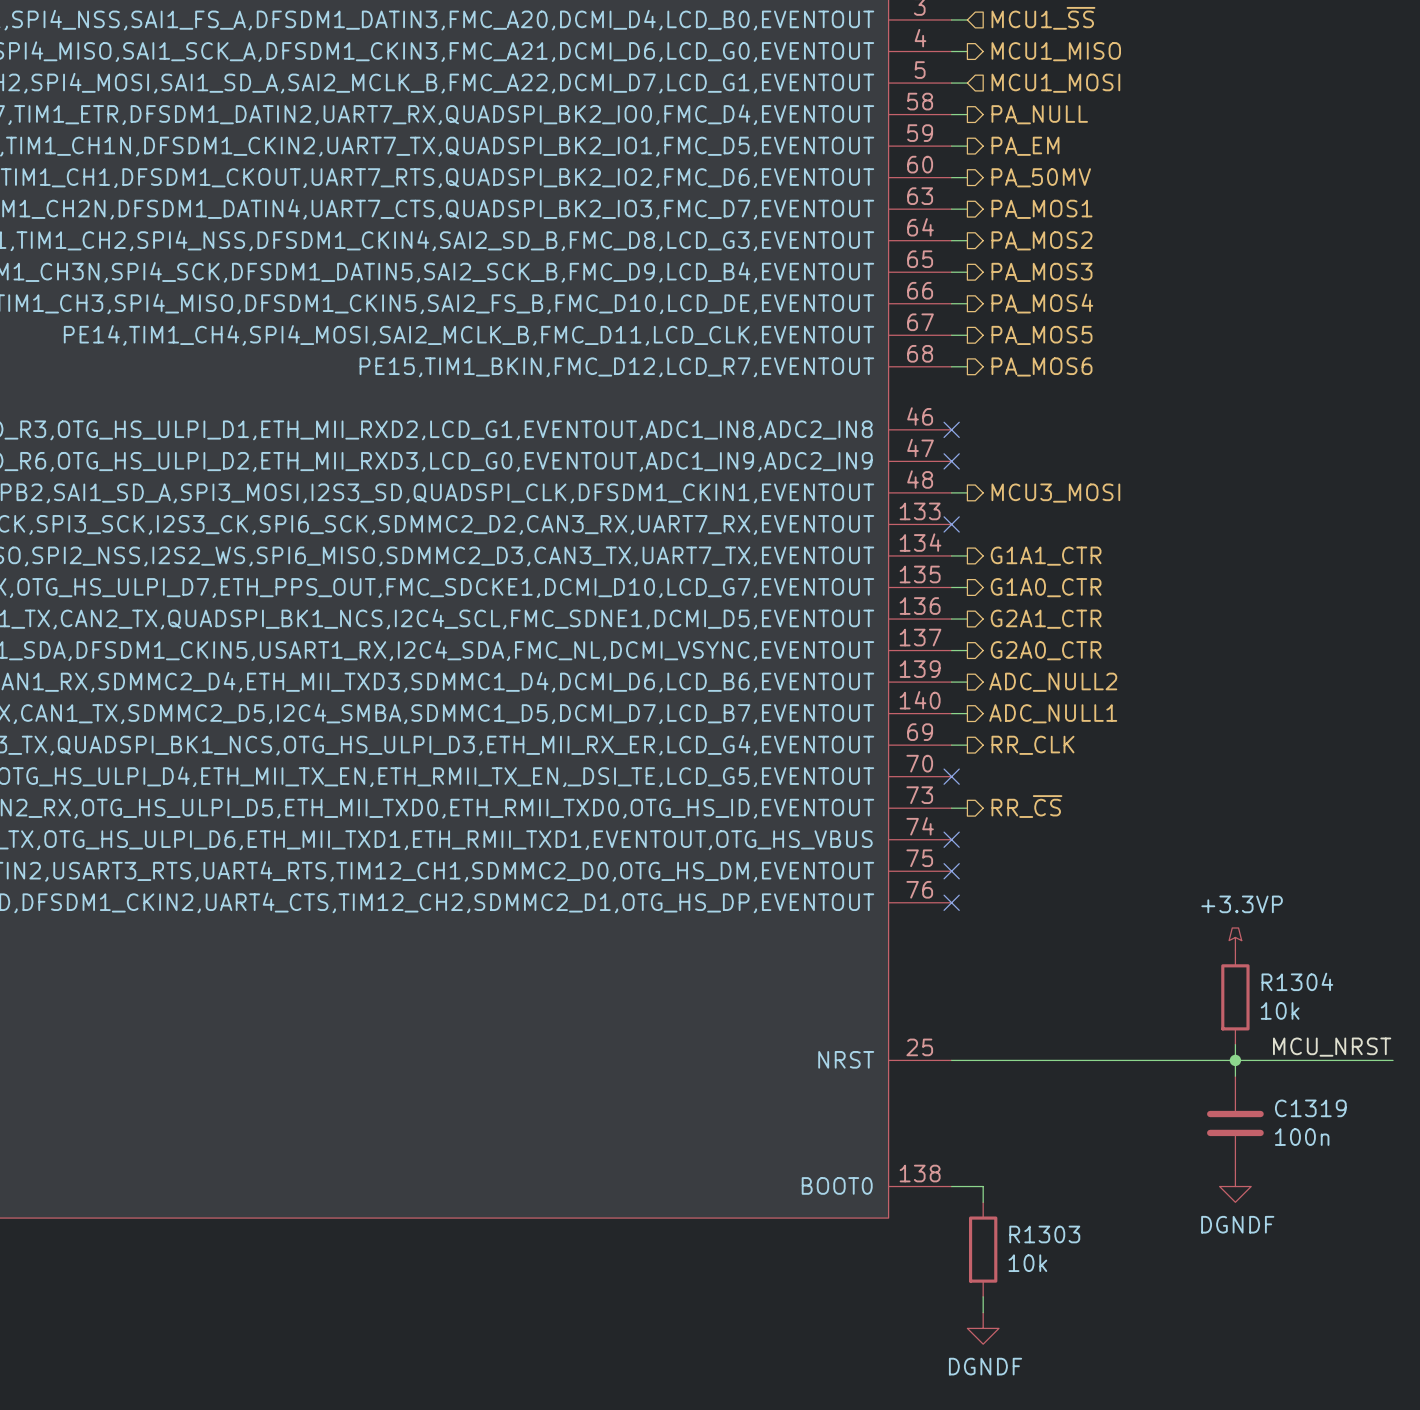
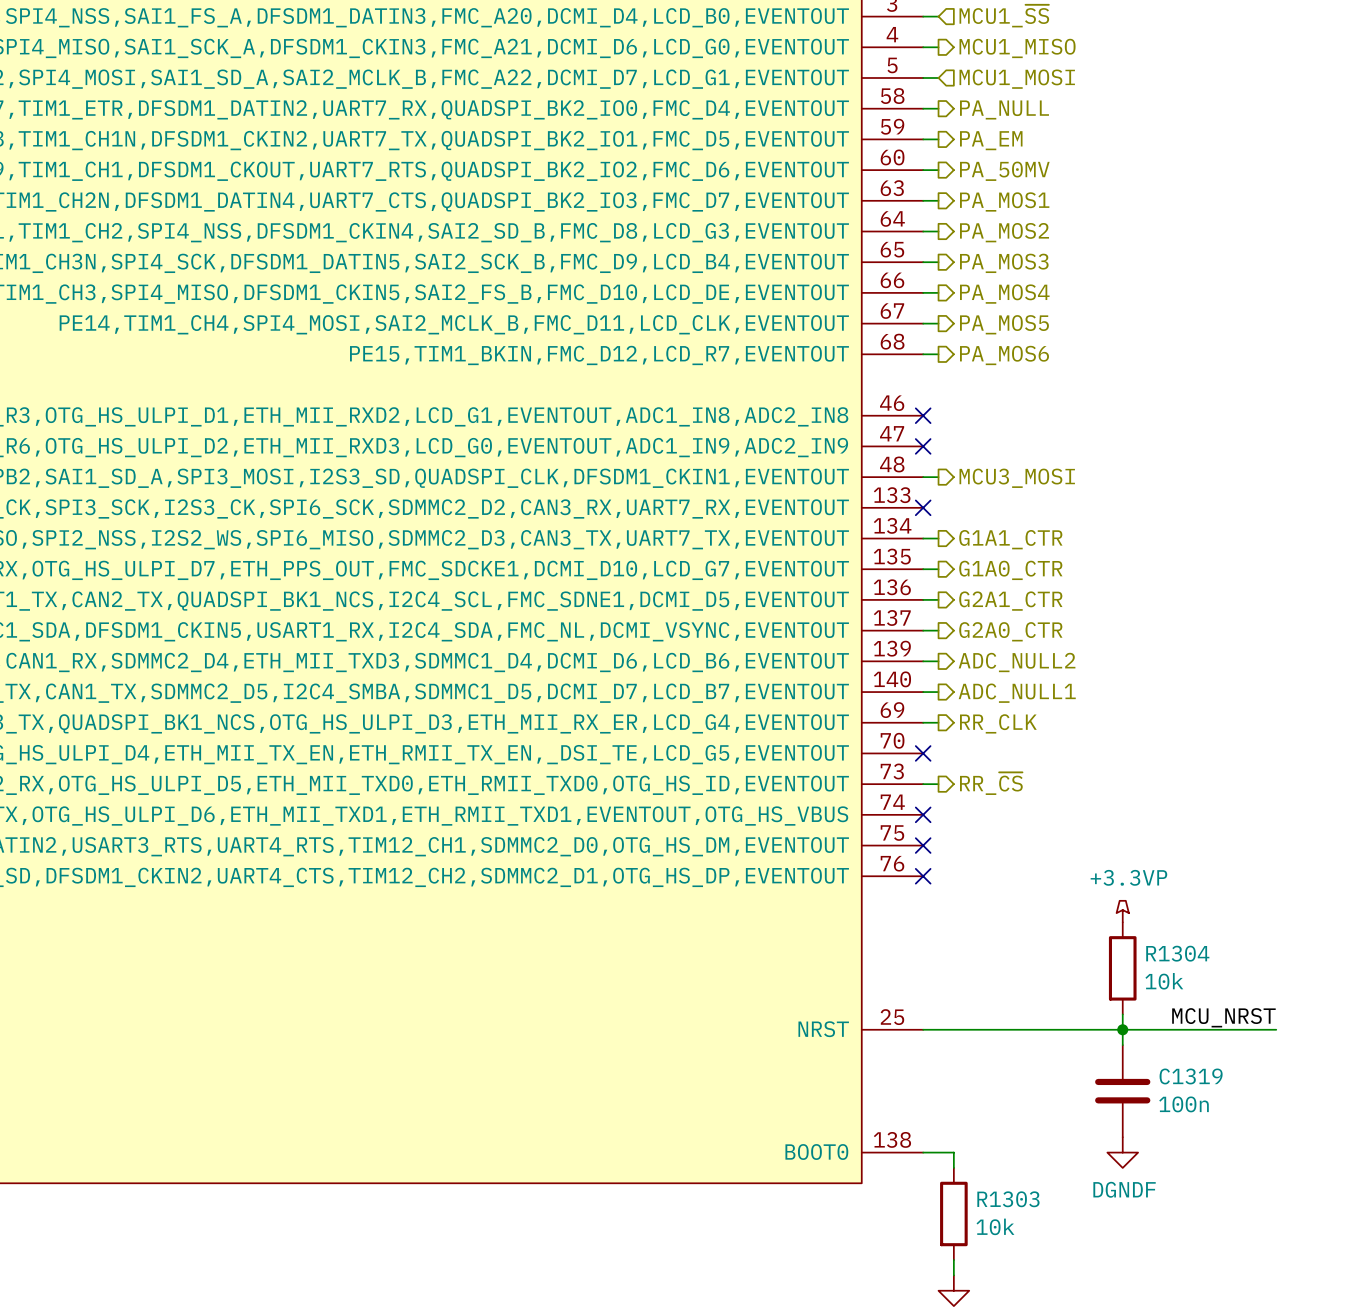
power symbol position: +3.3VP (1235, 939) -> +3.3VP (1122, 911)
R1304 position: (1235, 997) -> (1122, 968)
wire: (1235, 1044) (1235, 1076) -> (1122, 1014) (1122, 1045)
label position: MCU_NRST (1332, 1047) -> MCU_NRST (1223, 1017)
junction: none -> (1122, 1029)
junction: (1235, 1060) -> none
wire: (1314, 1060) (1393, 1060) -> none
C1319 position: (1235, 1123) -> (1122, 1091)
power symbol position: DGNDF (1235, 1186) -> DGNDF (1122, 1152)

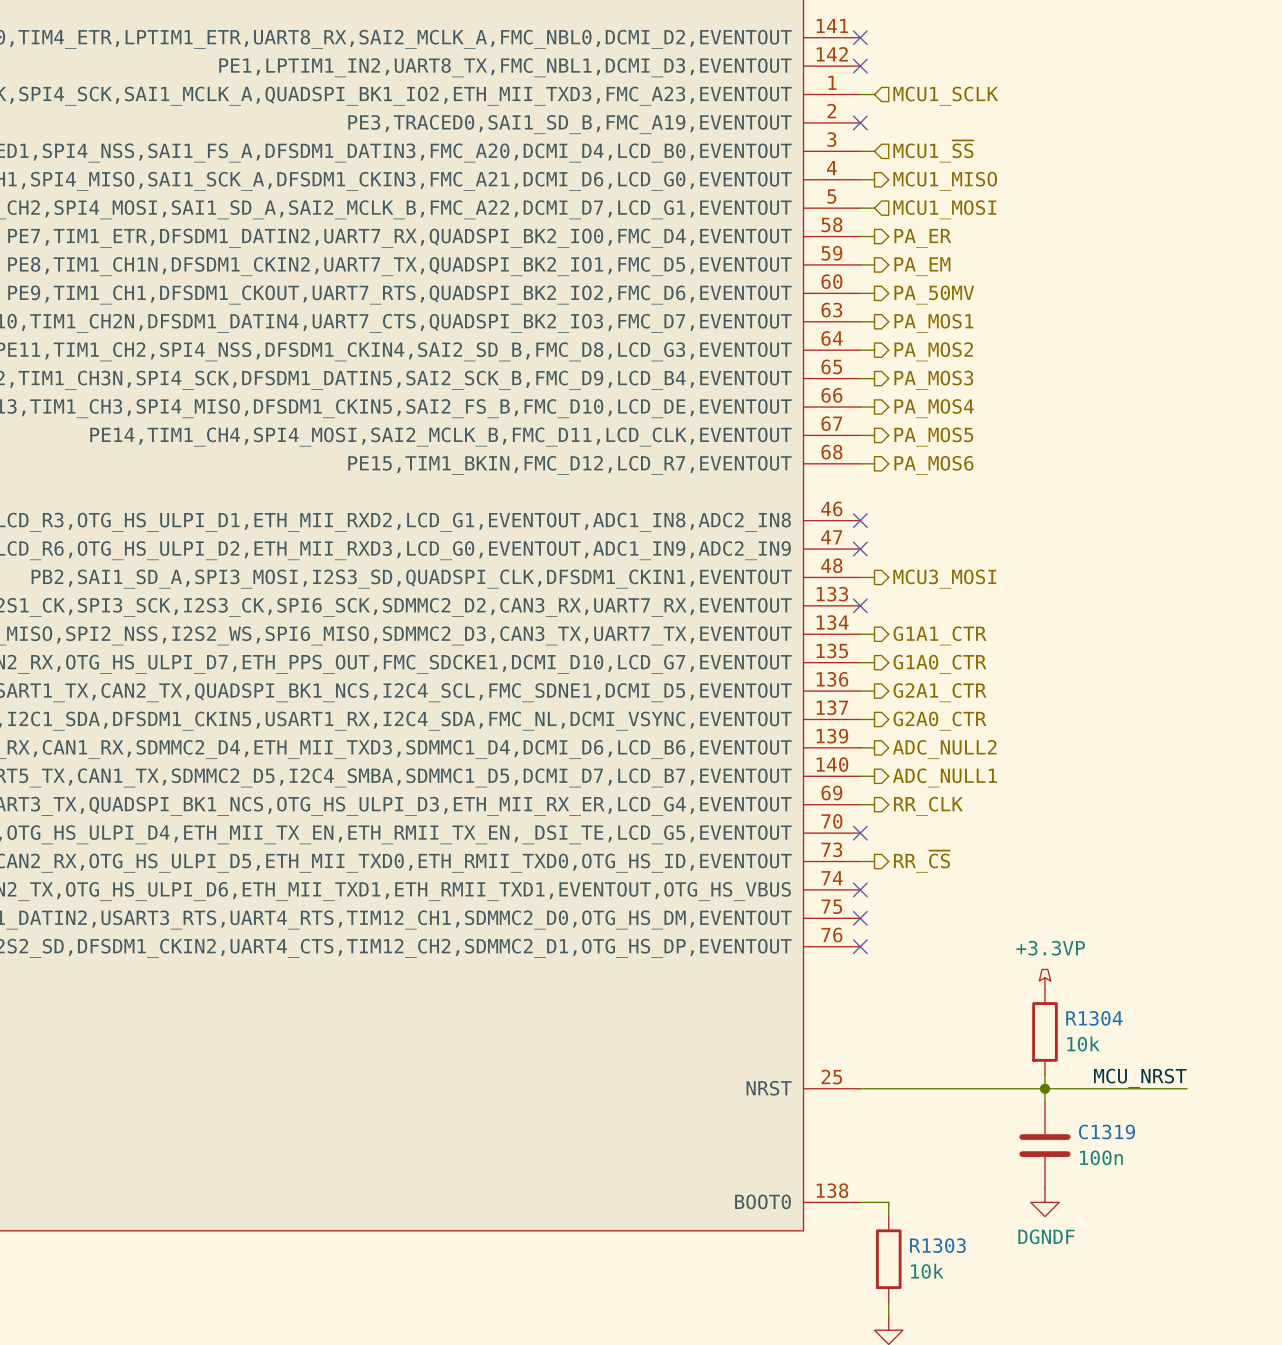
hierarchical label: PA_NULL (1004, 109) -> PA_ER (922, 238)

